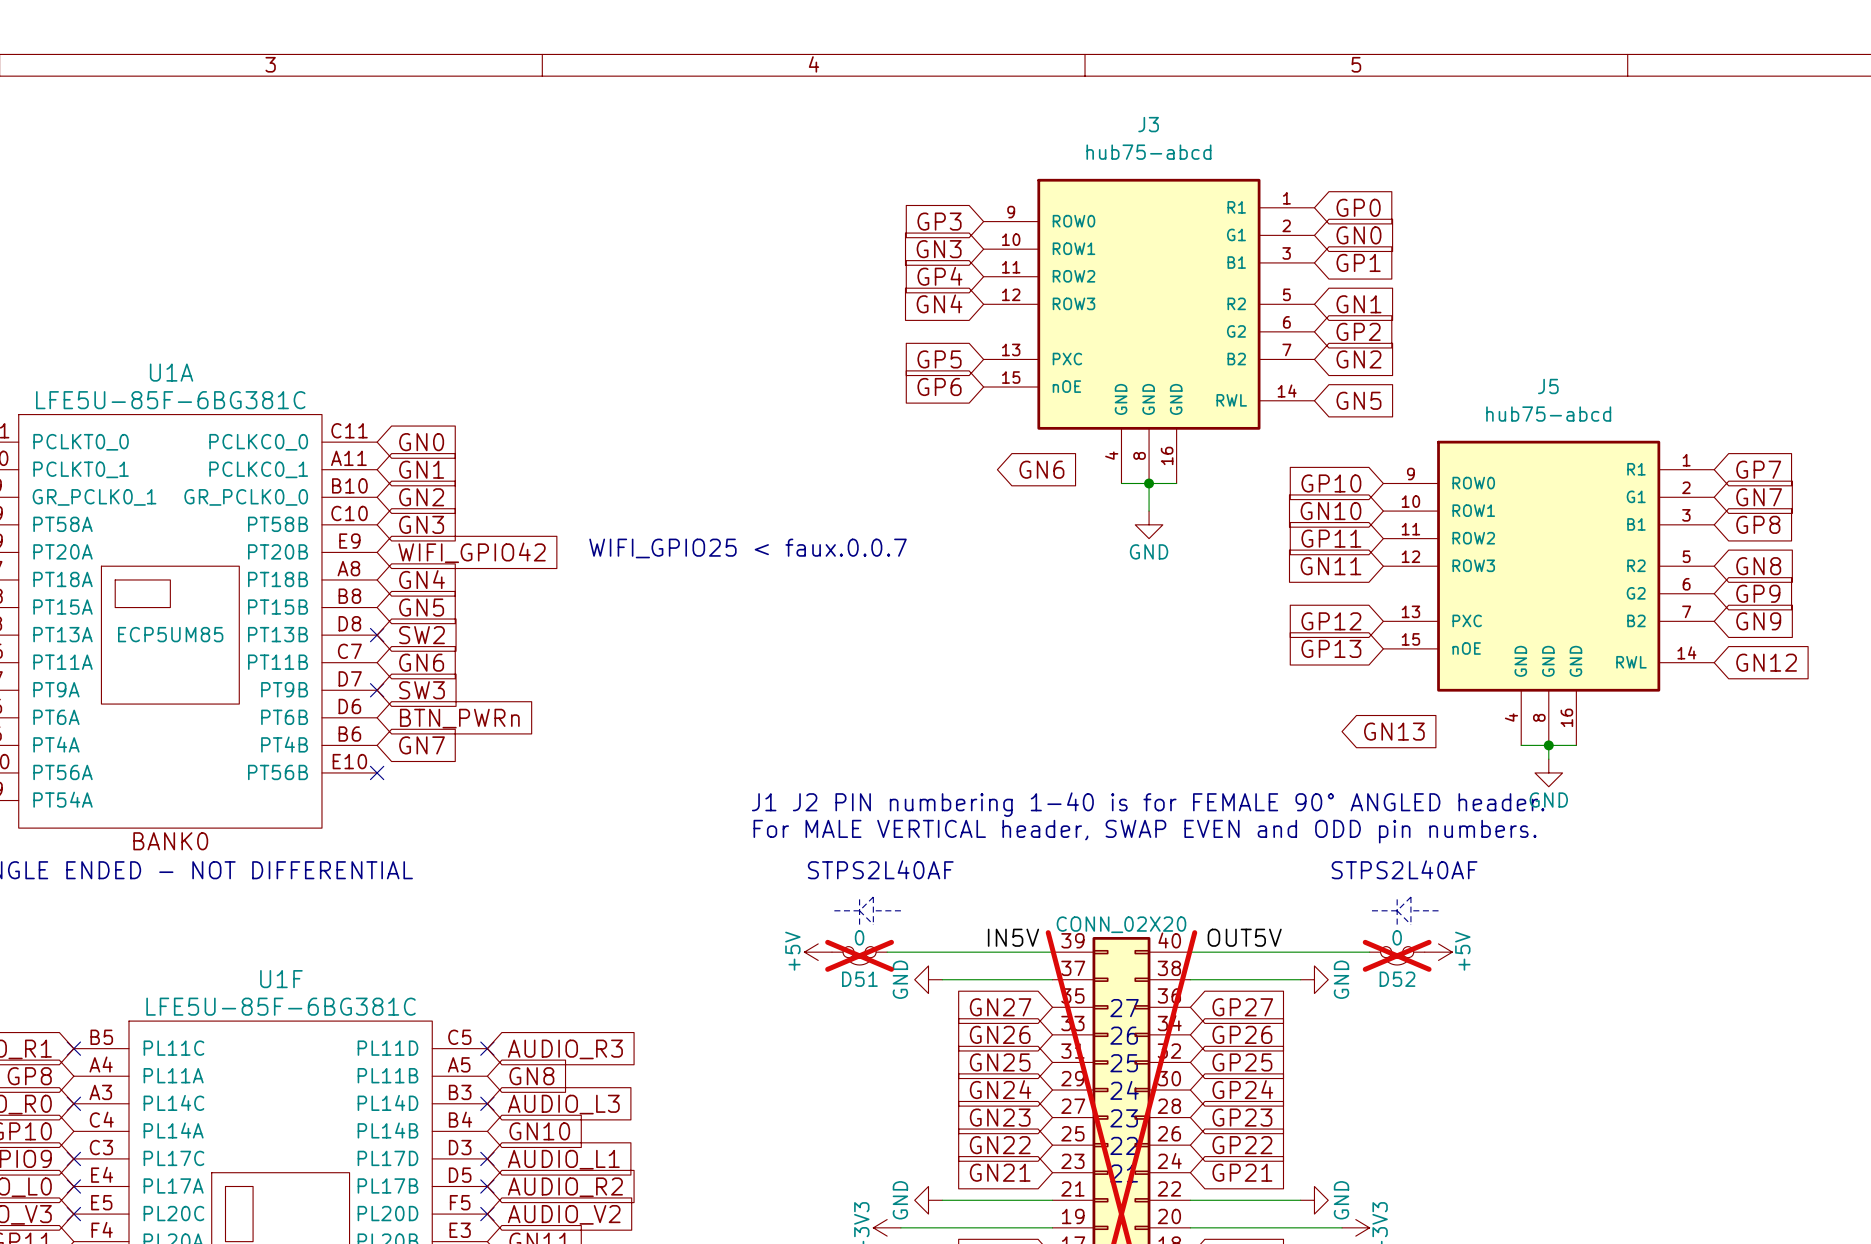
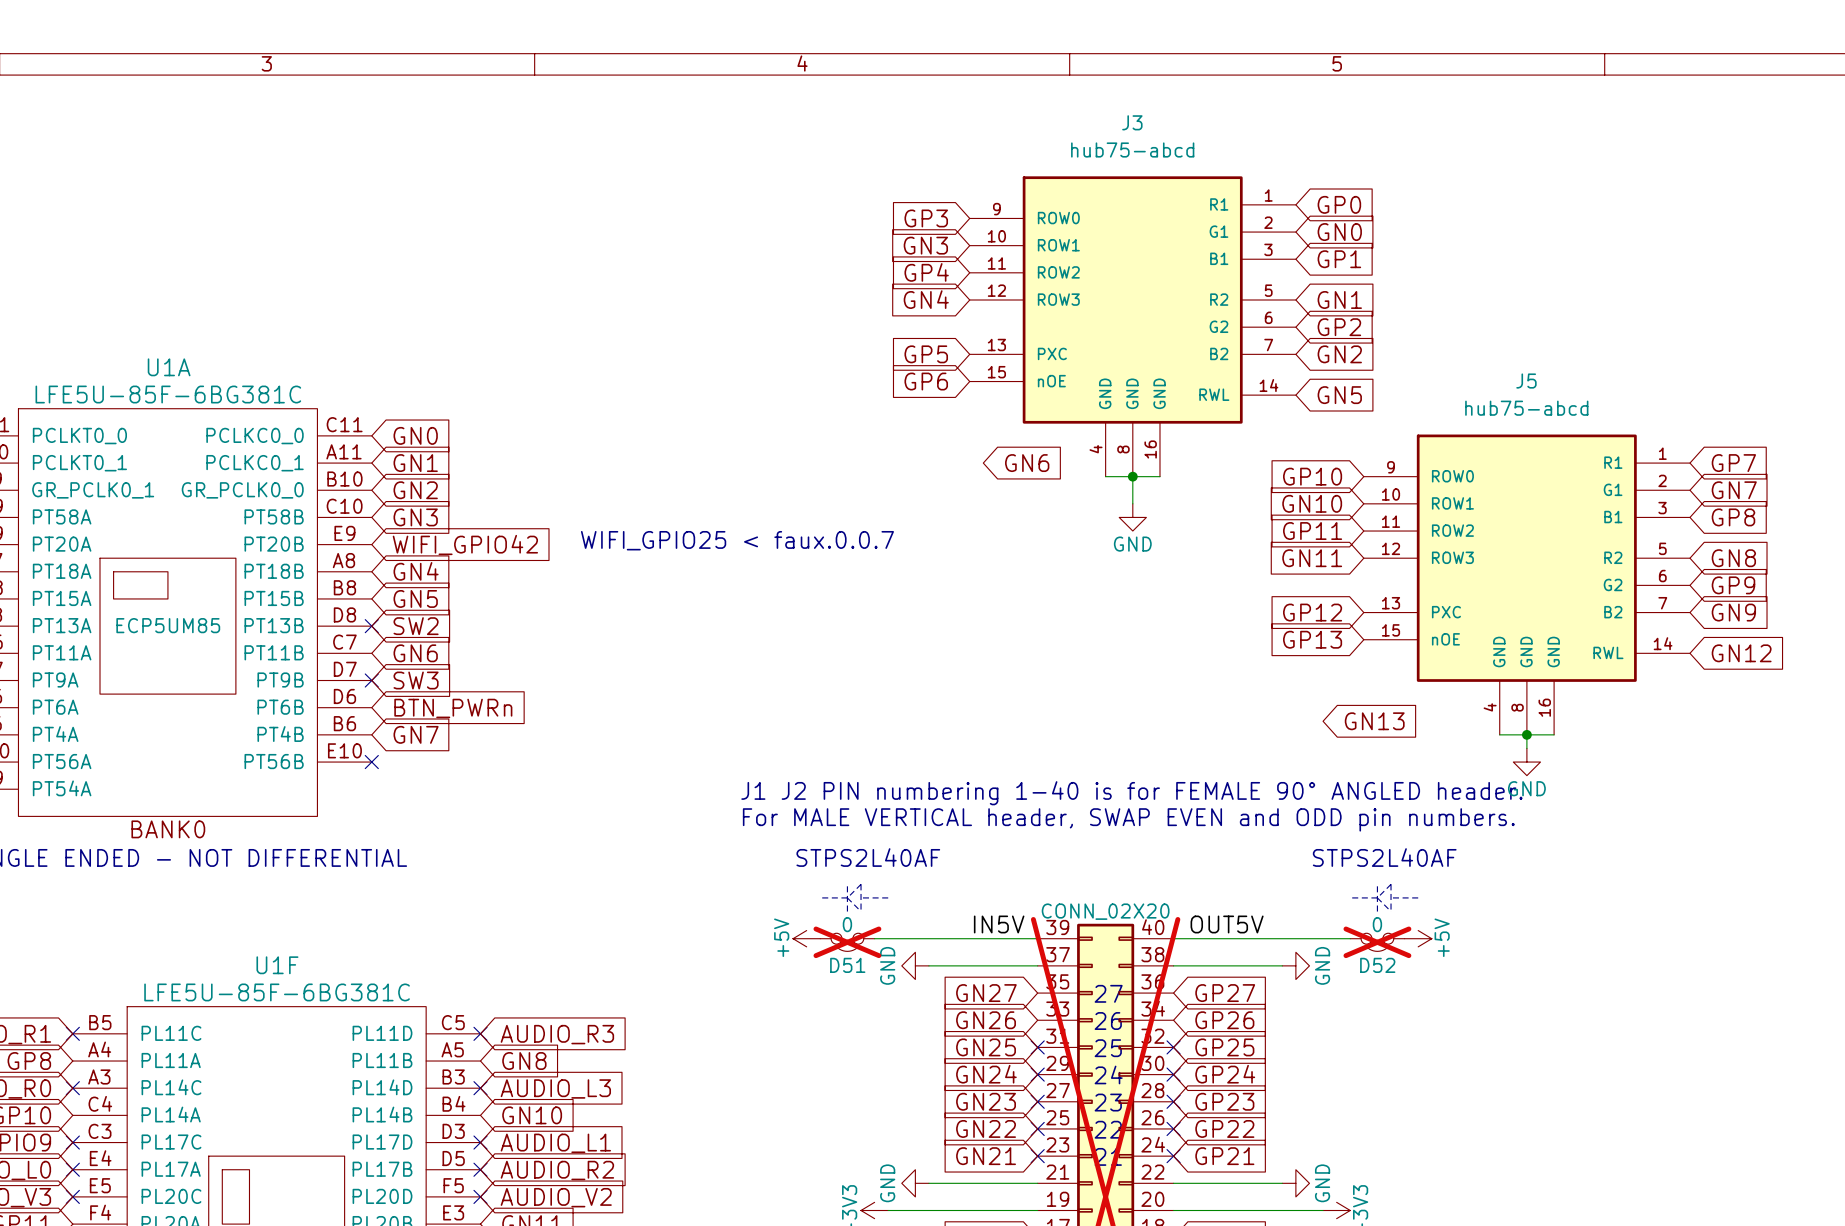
no-connect mark: none -> (1037, 1047)
no-connect mark: none -> (1173, 1047)
no-connect mark: none -> (1037, 1074)
no-connect mark: none -> (1173, 1074)
no-connect mark: none -> (1037, 1101)
no-connect mark: none -> (1173, 1101)
no-connect mark: none -> (1037, 1128)
no-connect mark: none -> (1173, 1128)
no-connect mark: none -> (1037, 1156)
no-connect mark: none -> (1173, 1156)

